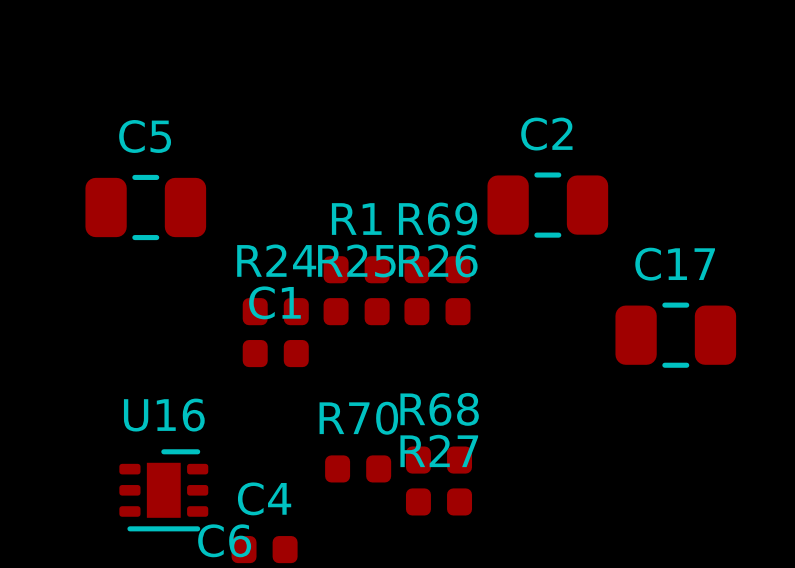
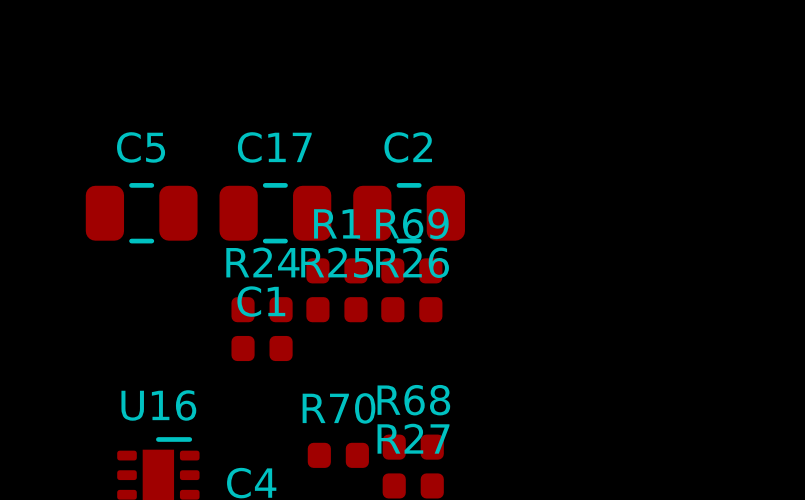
C2 position: (547, 205) -> (409, 213)
C17 position: (675, 335) -> (275, 213)

